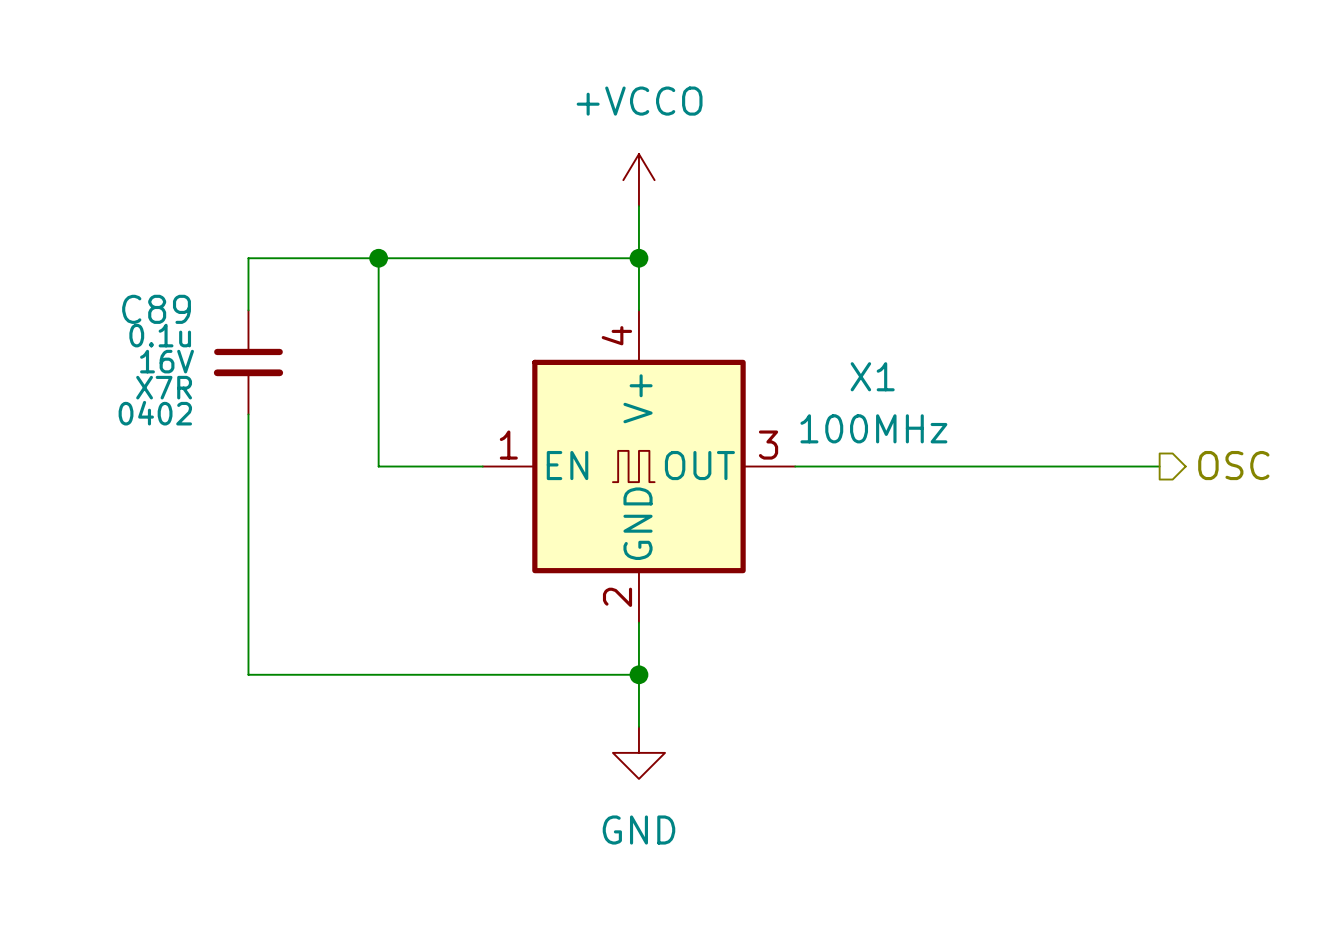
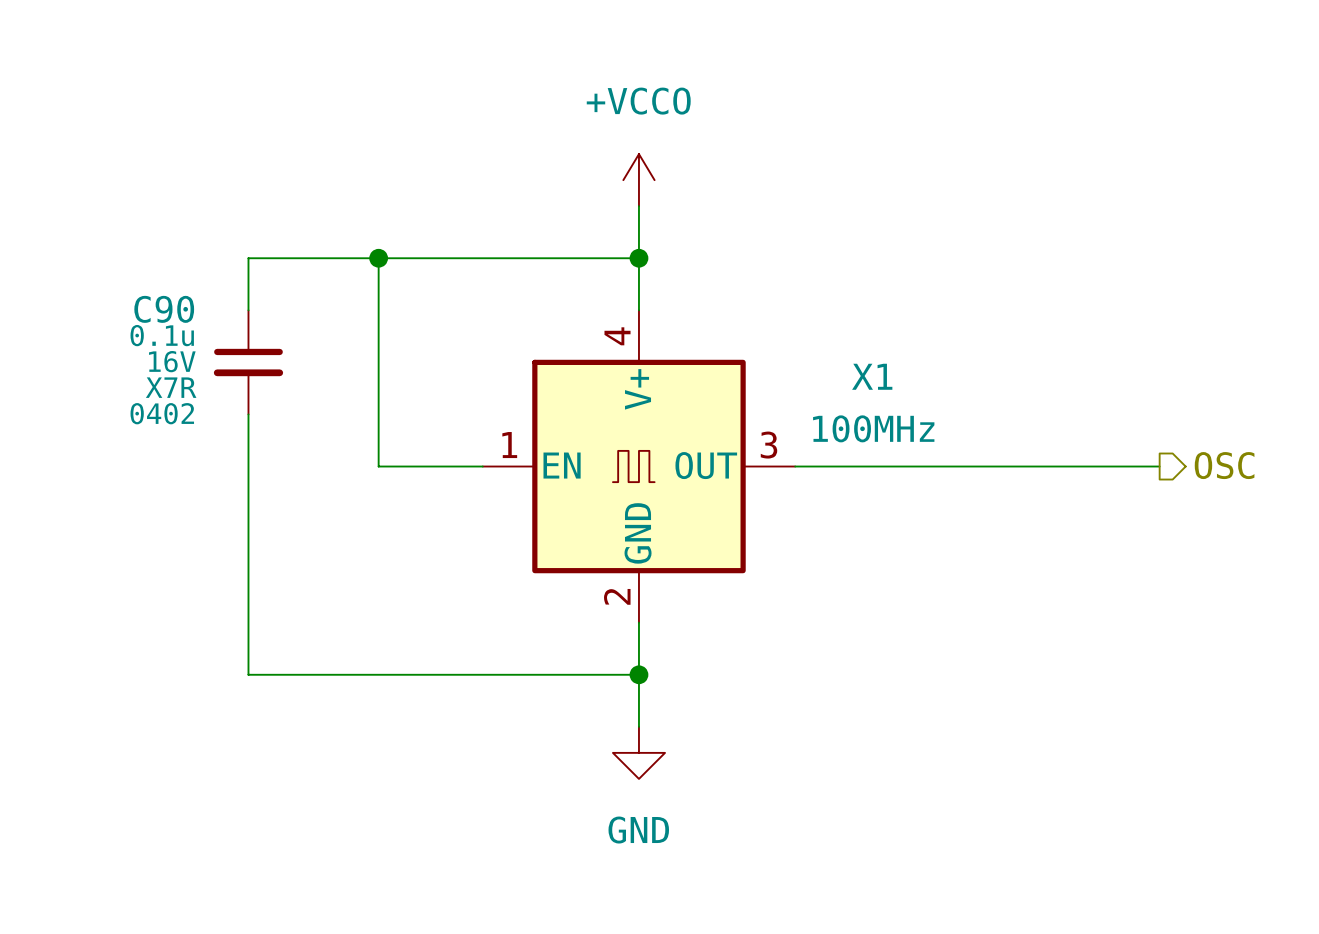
C89 name: C89 (156, 309) -> C90 (164, 309)

